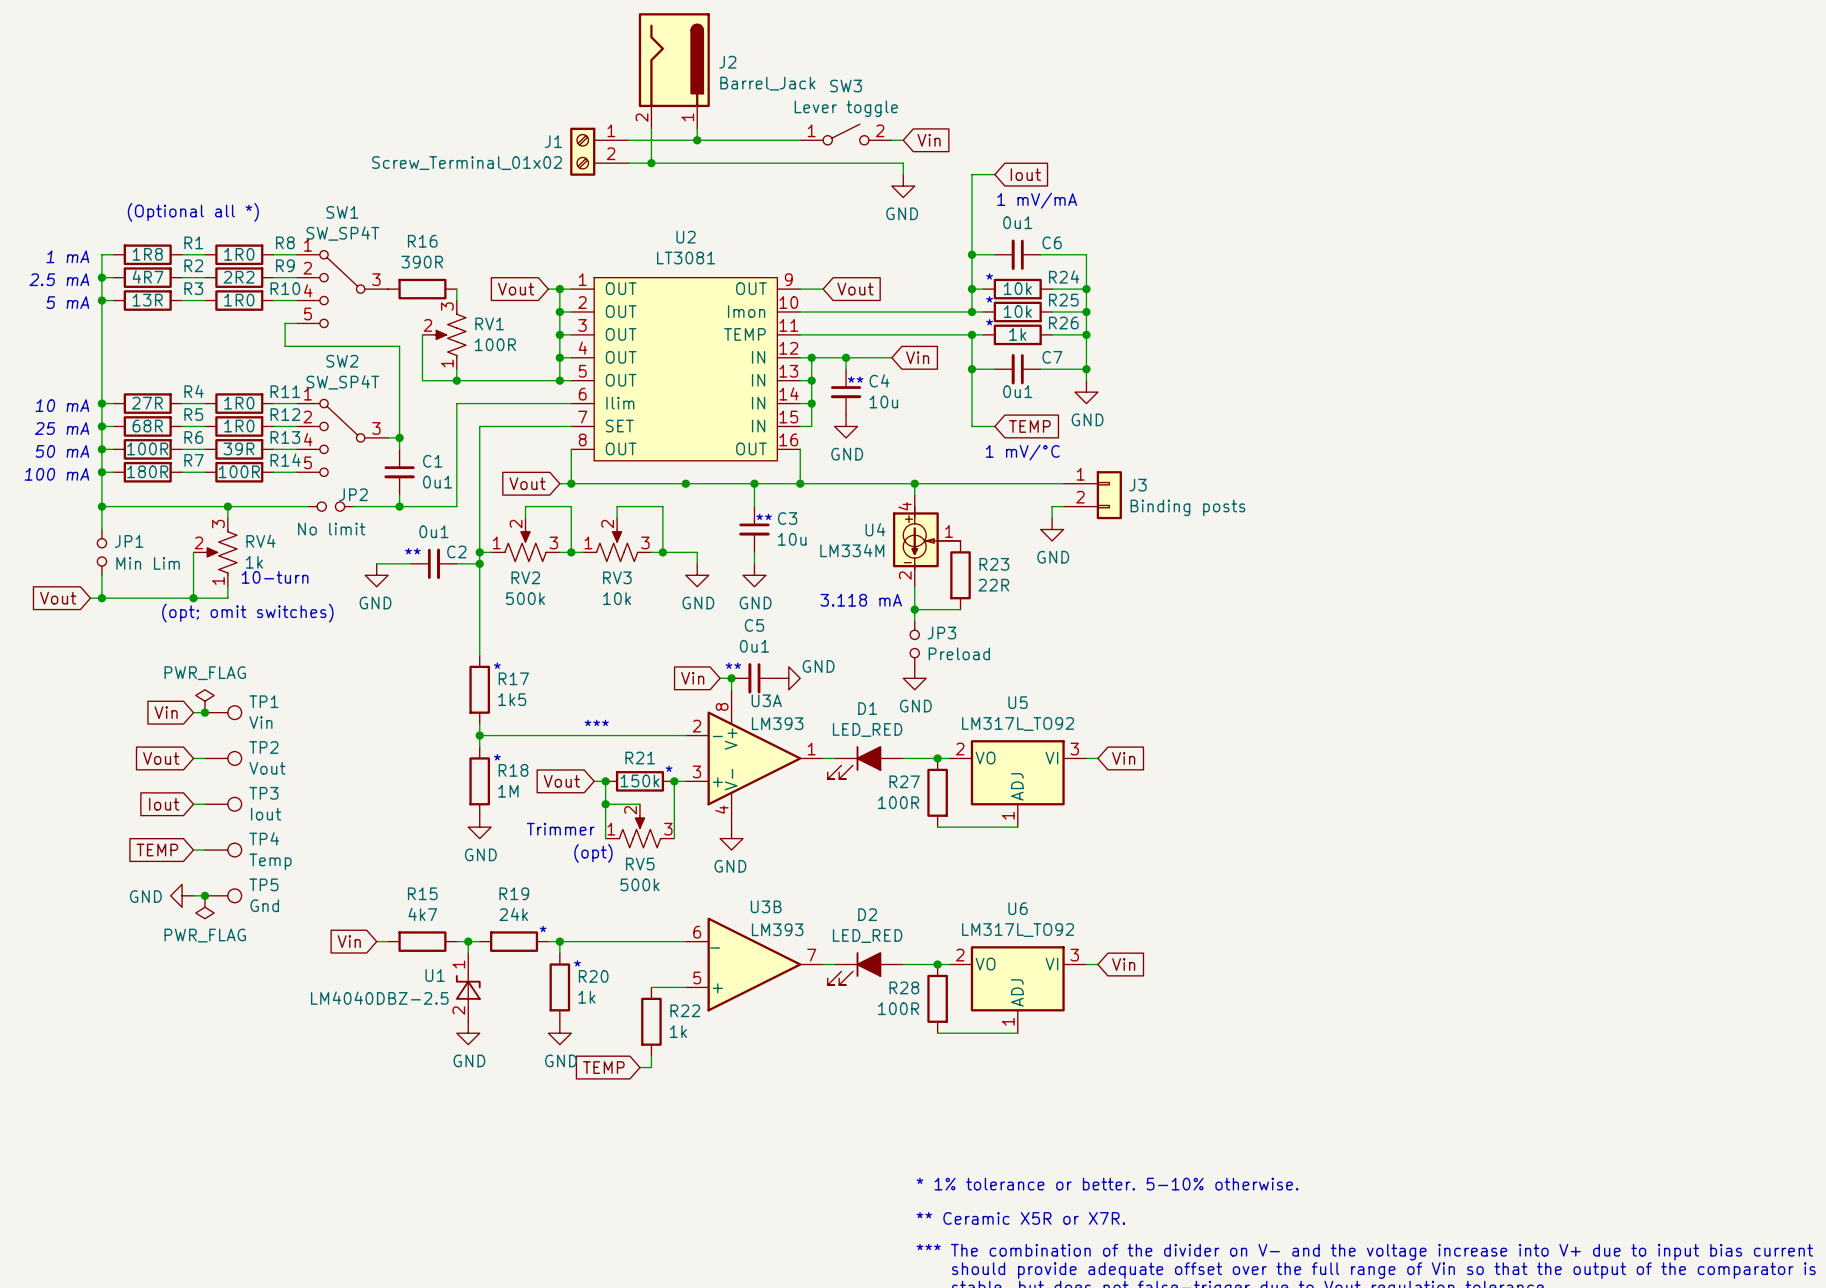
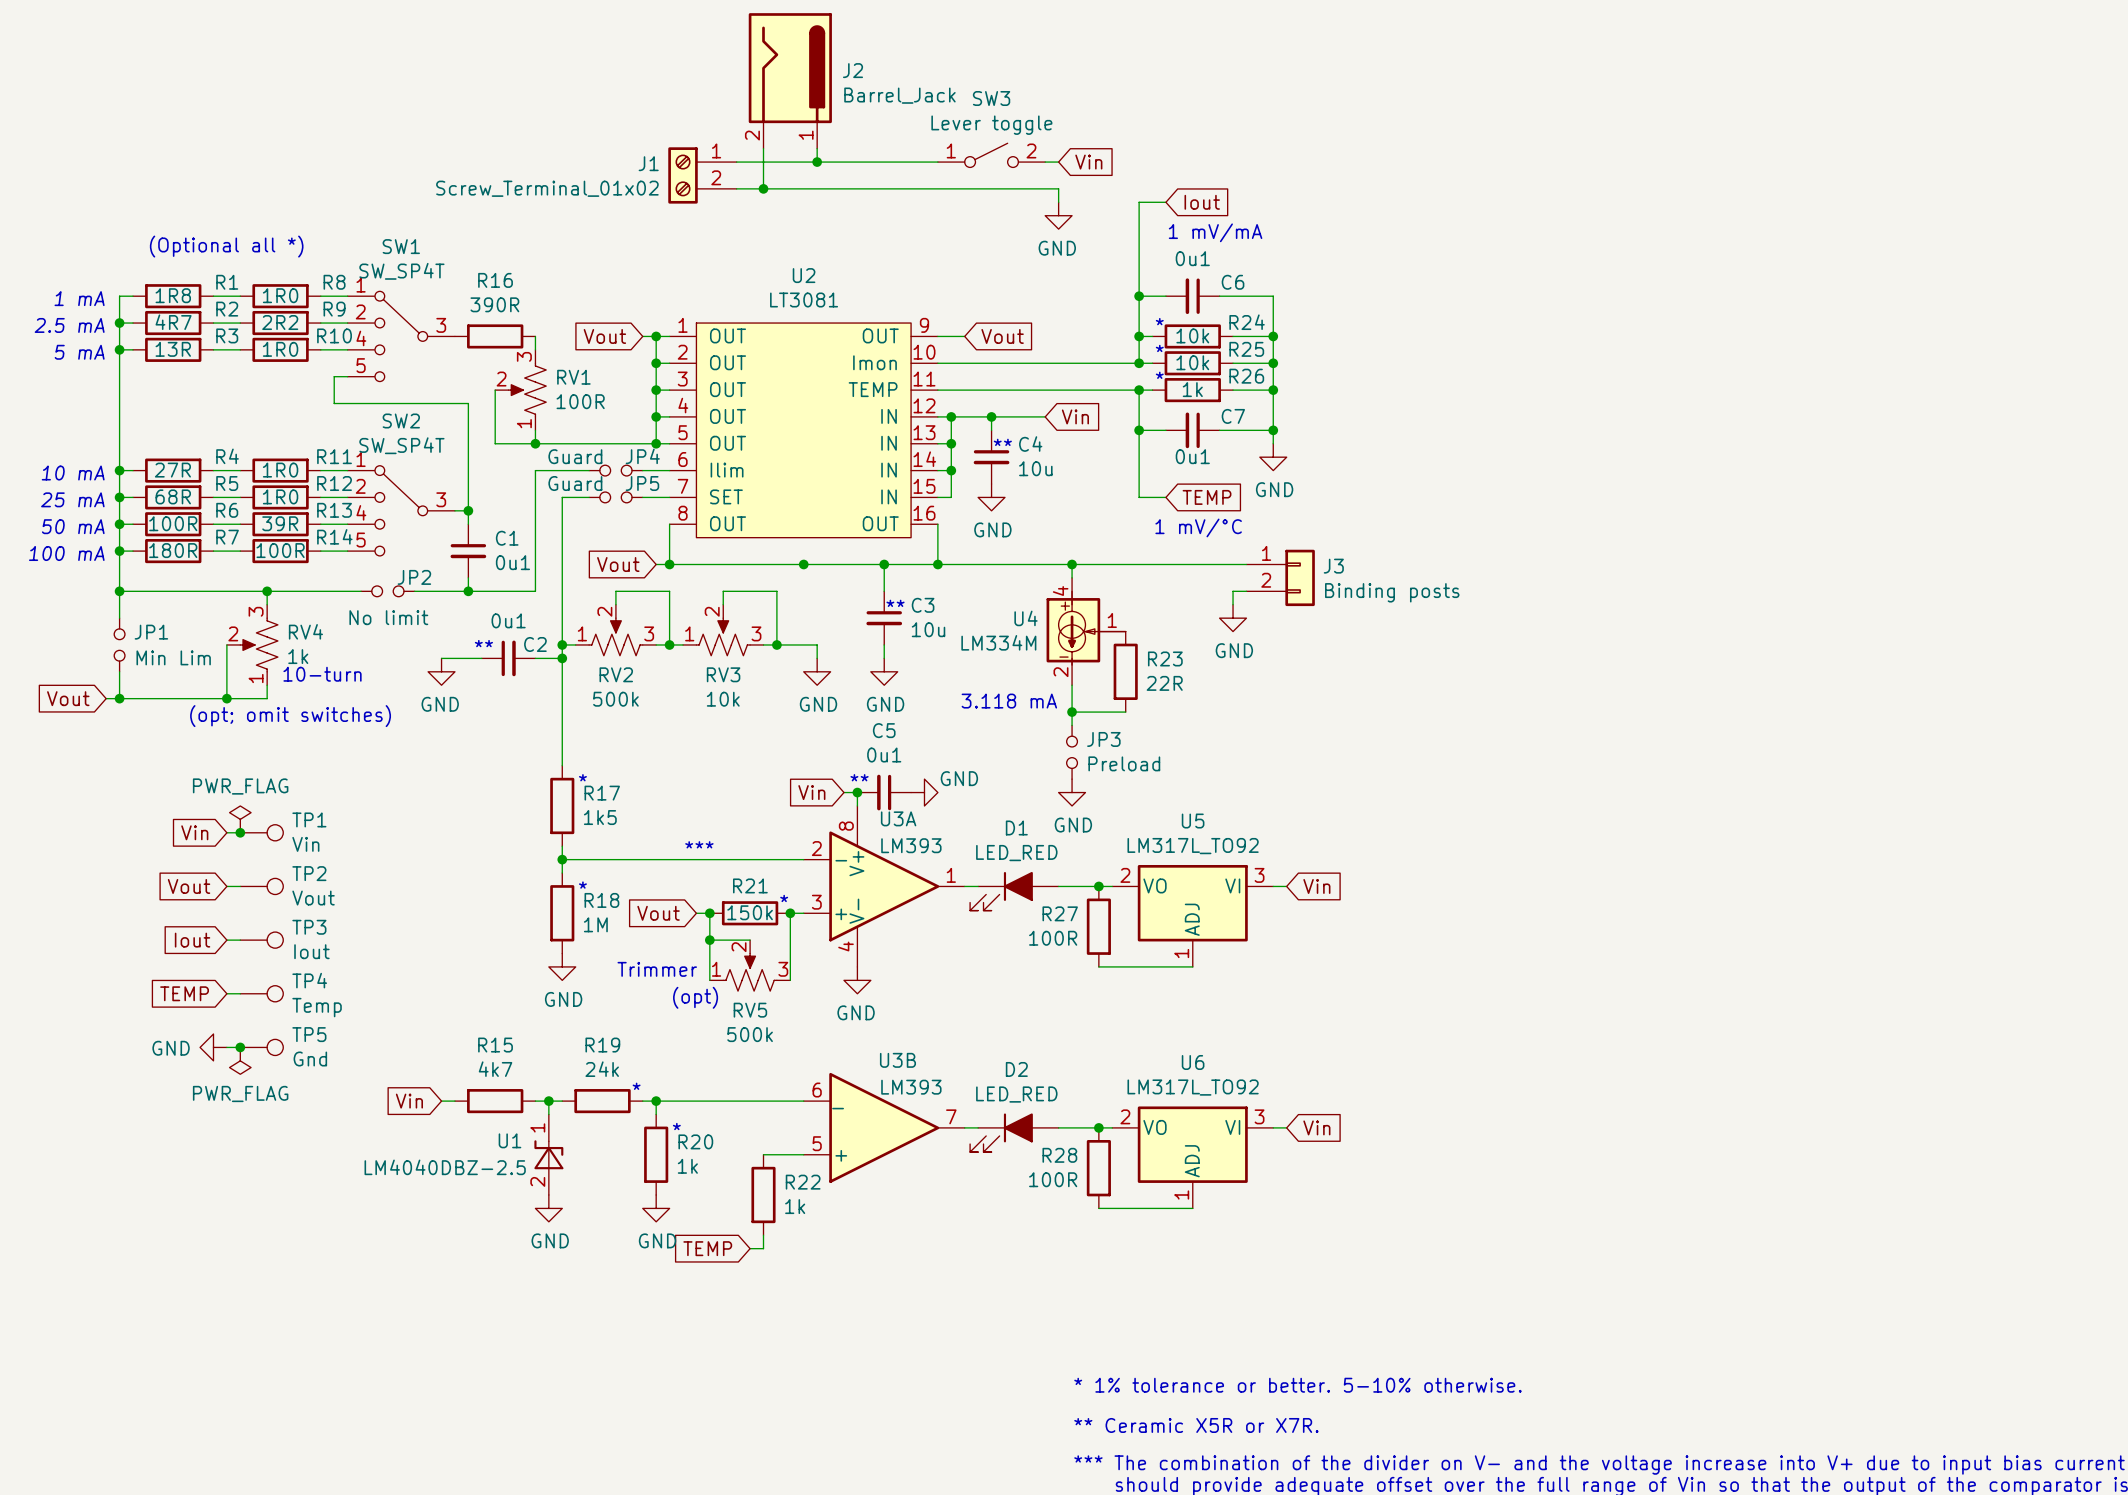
wire: (502, 403) (548, 403) -> none
JP4: none -> Guard (615, 470)
wire: (502, 426) (548, 426) -> none
JP5: none -> Guard (615, 497)

